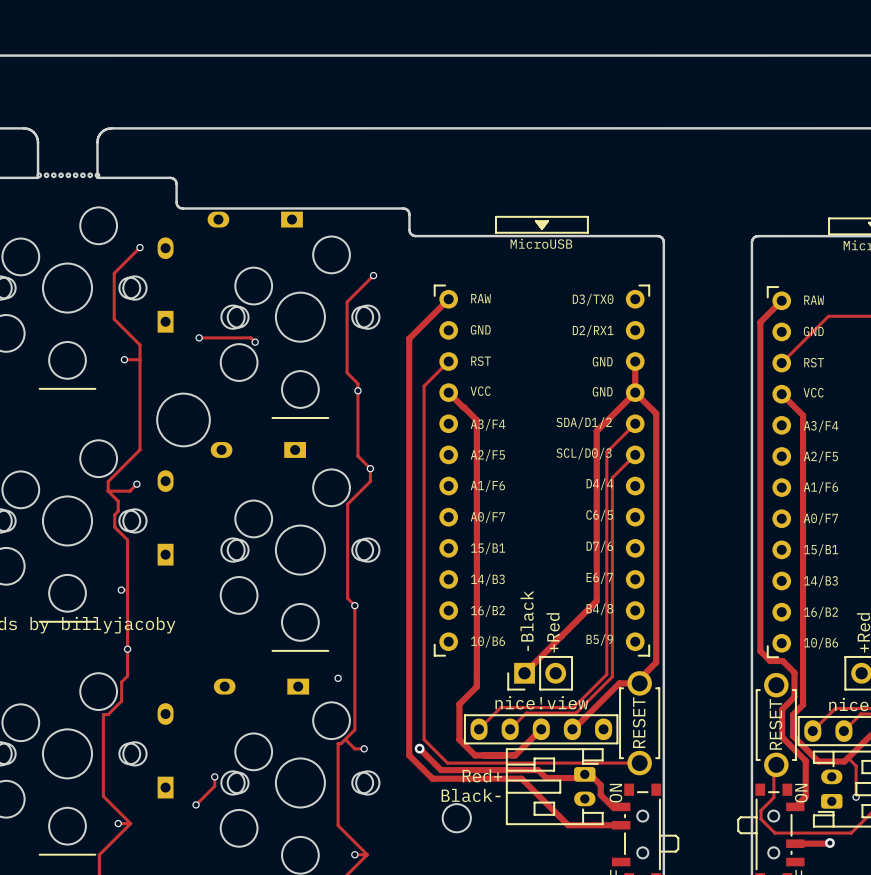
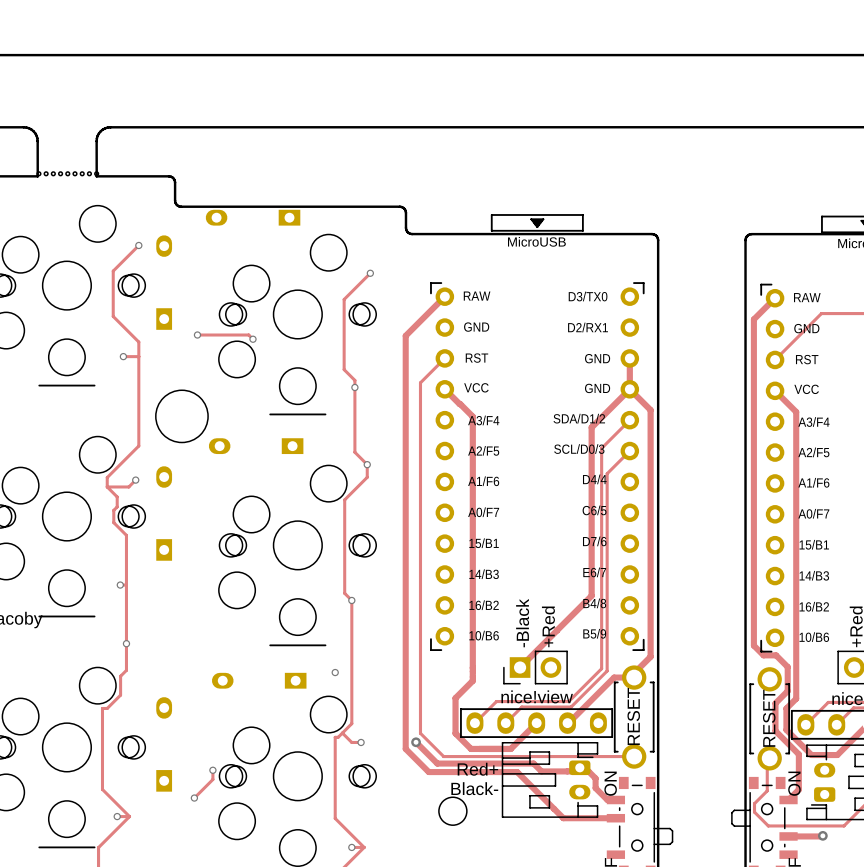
track: (848, 758) (856, 765) (856, 797) -> none
via: (856, 797) -> none

